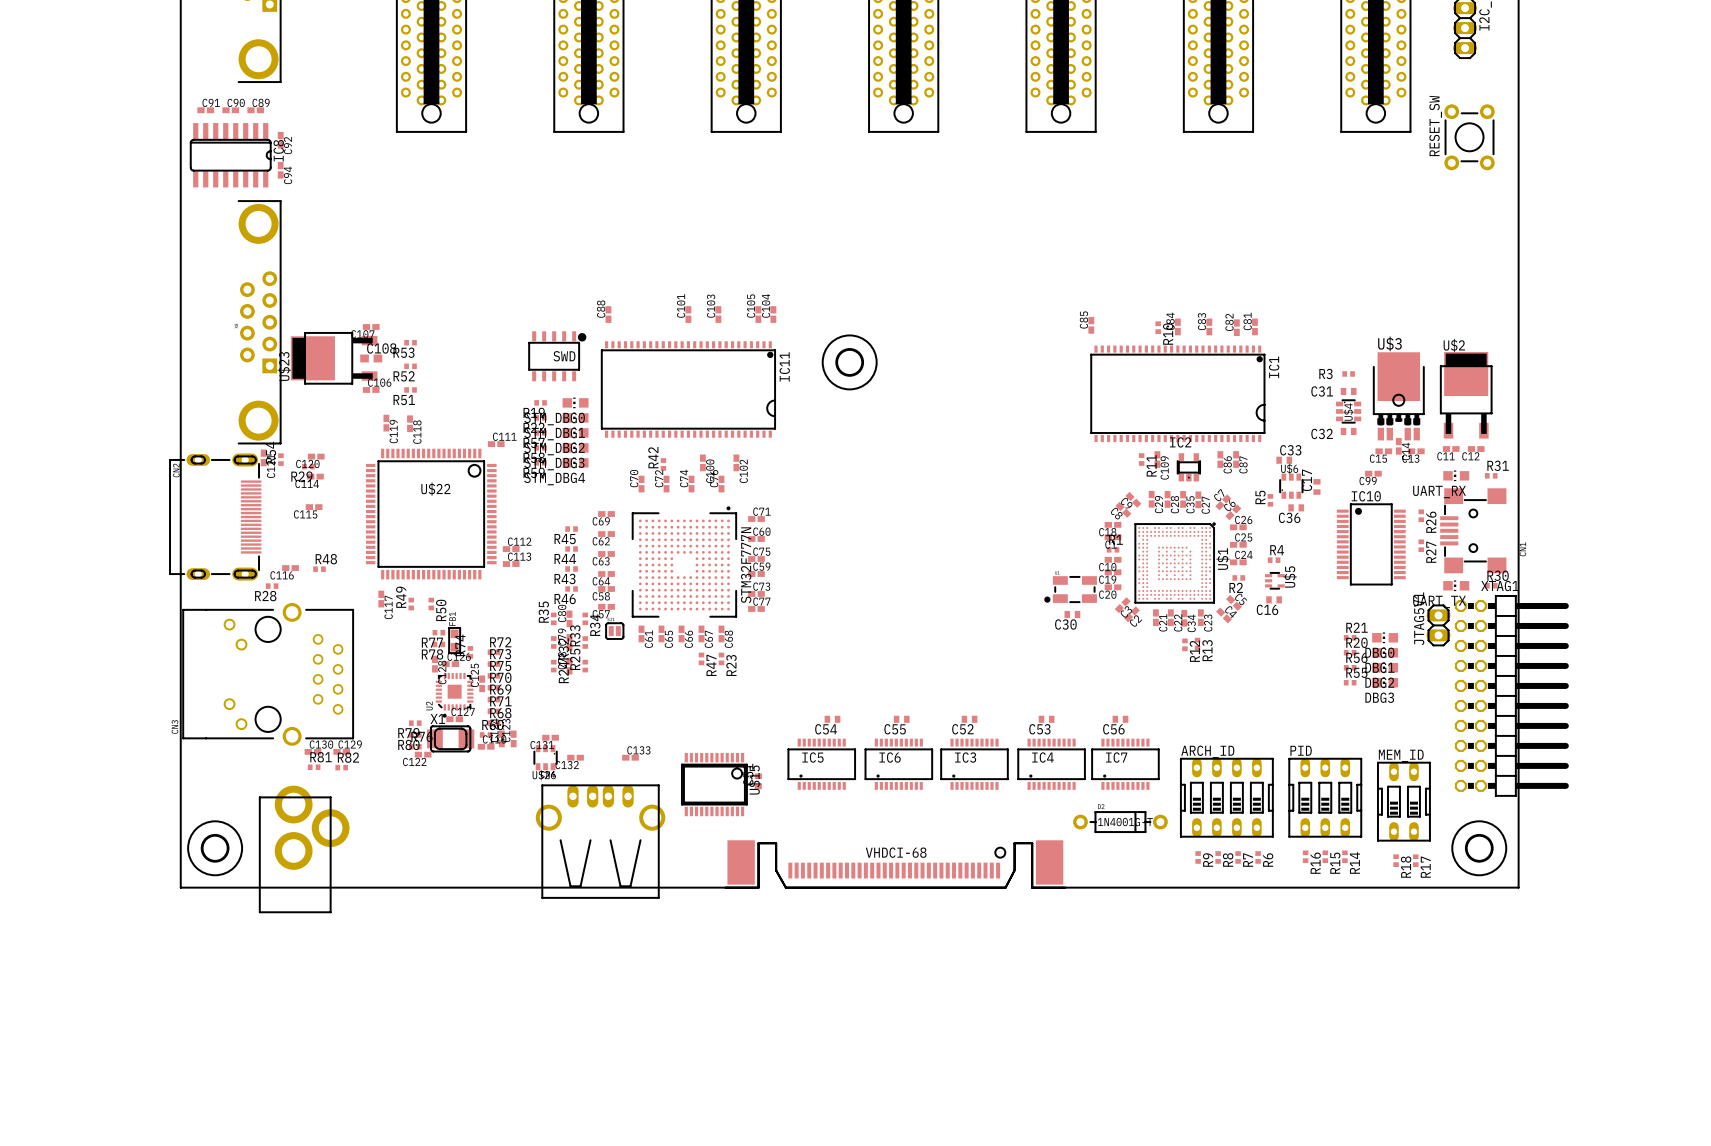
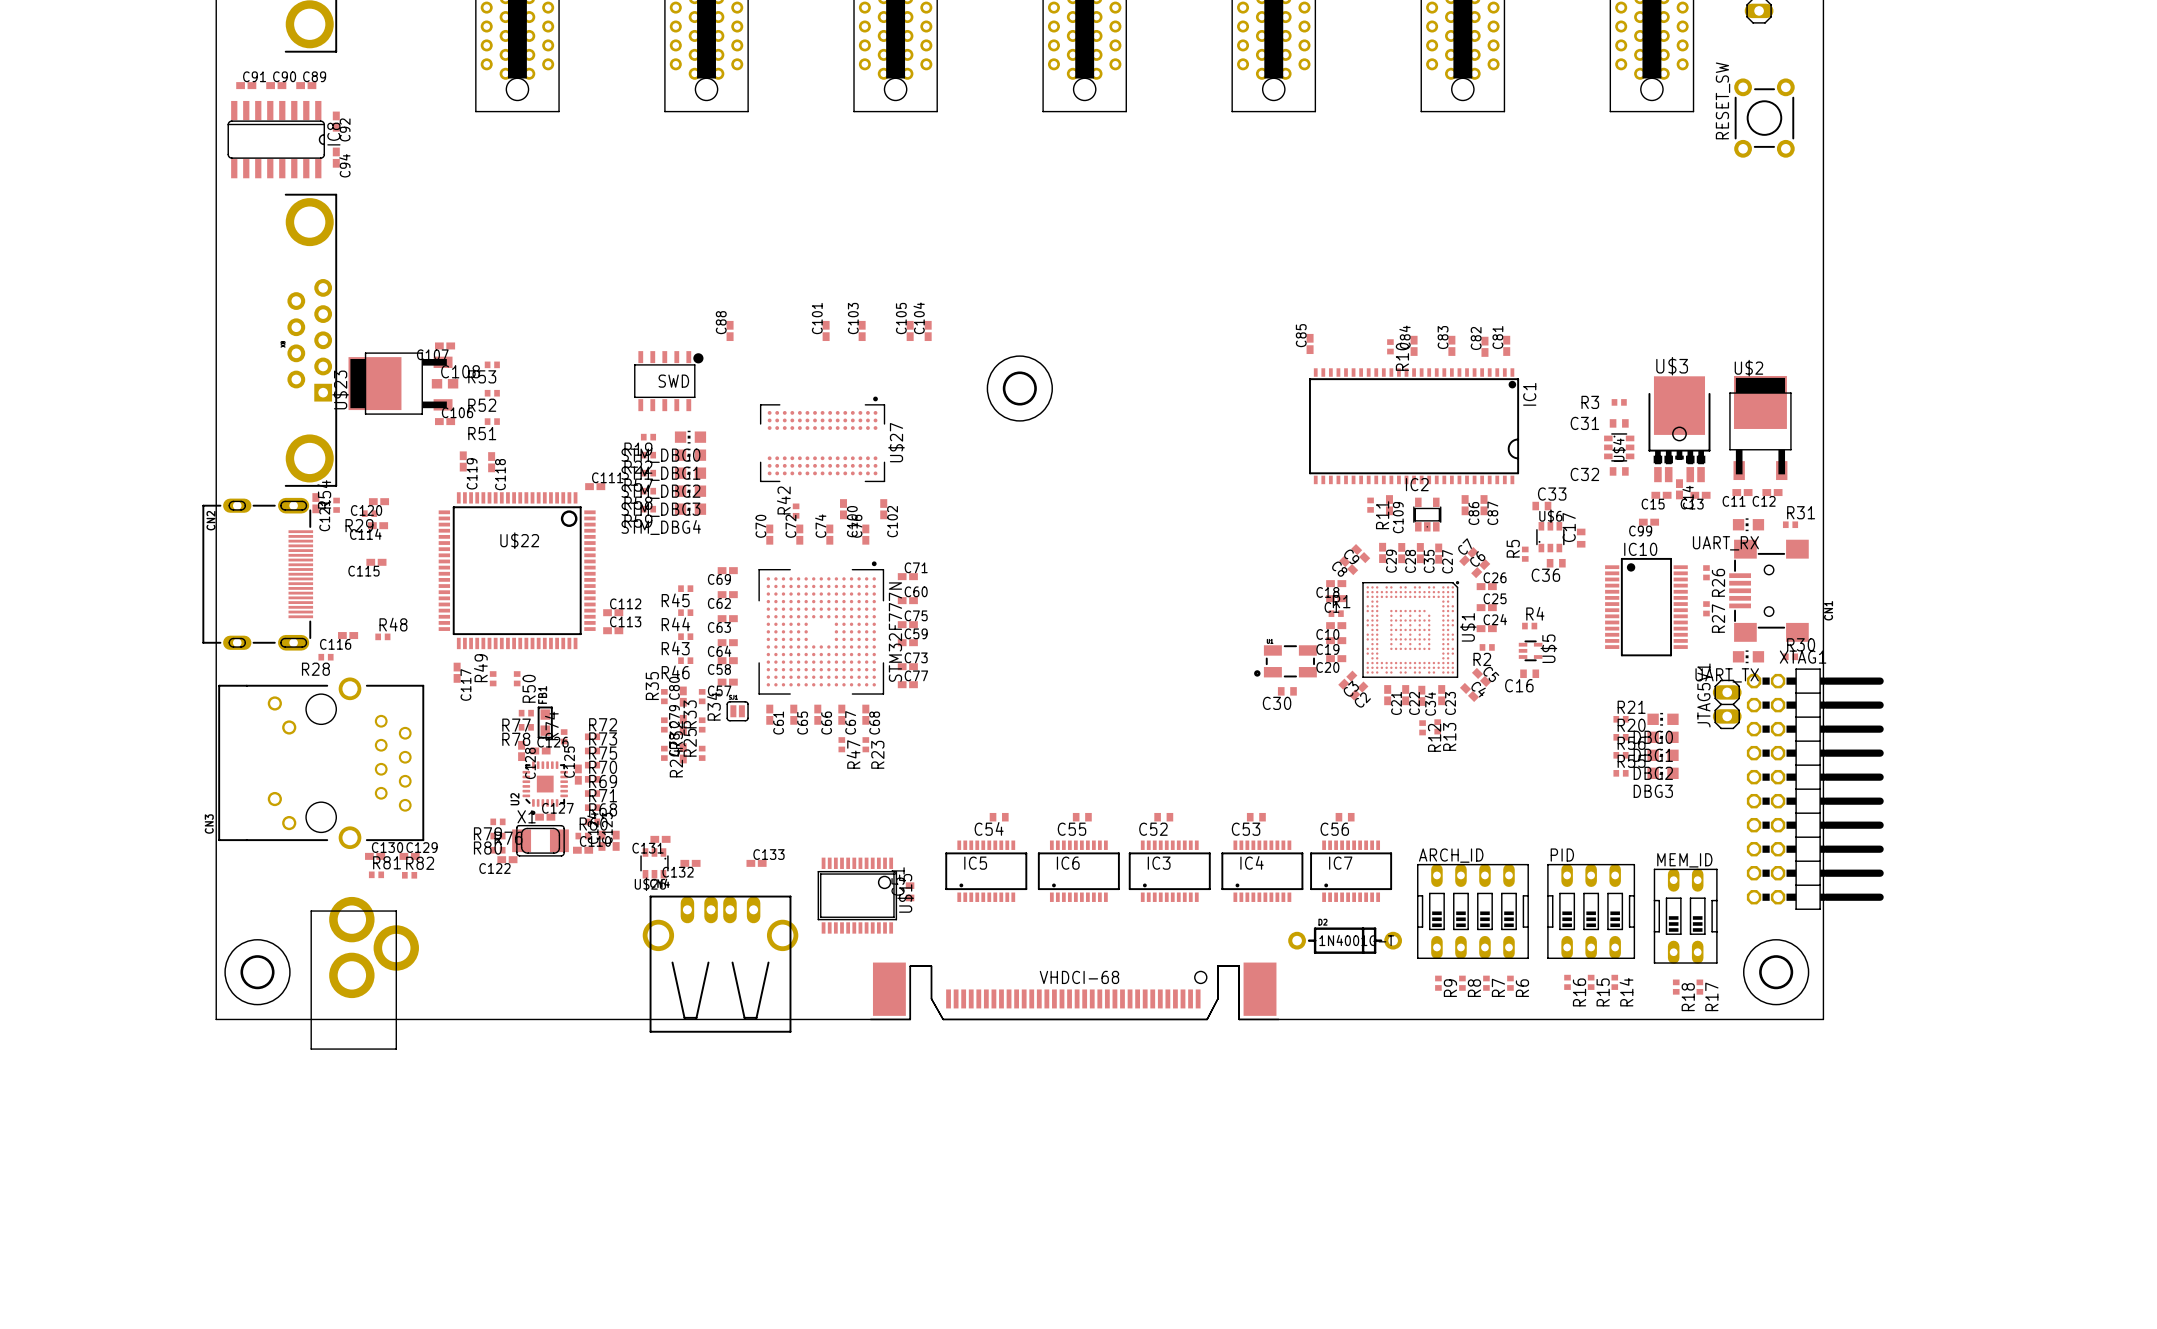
IC11: (688, 389) -> none
U$27: none -> (822, 439)

